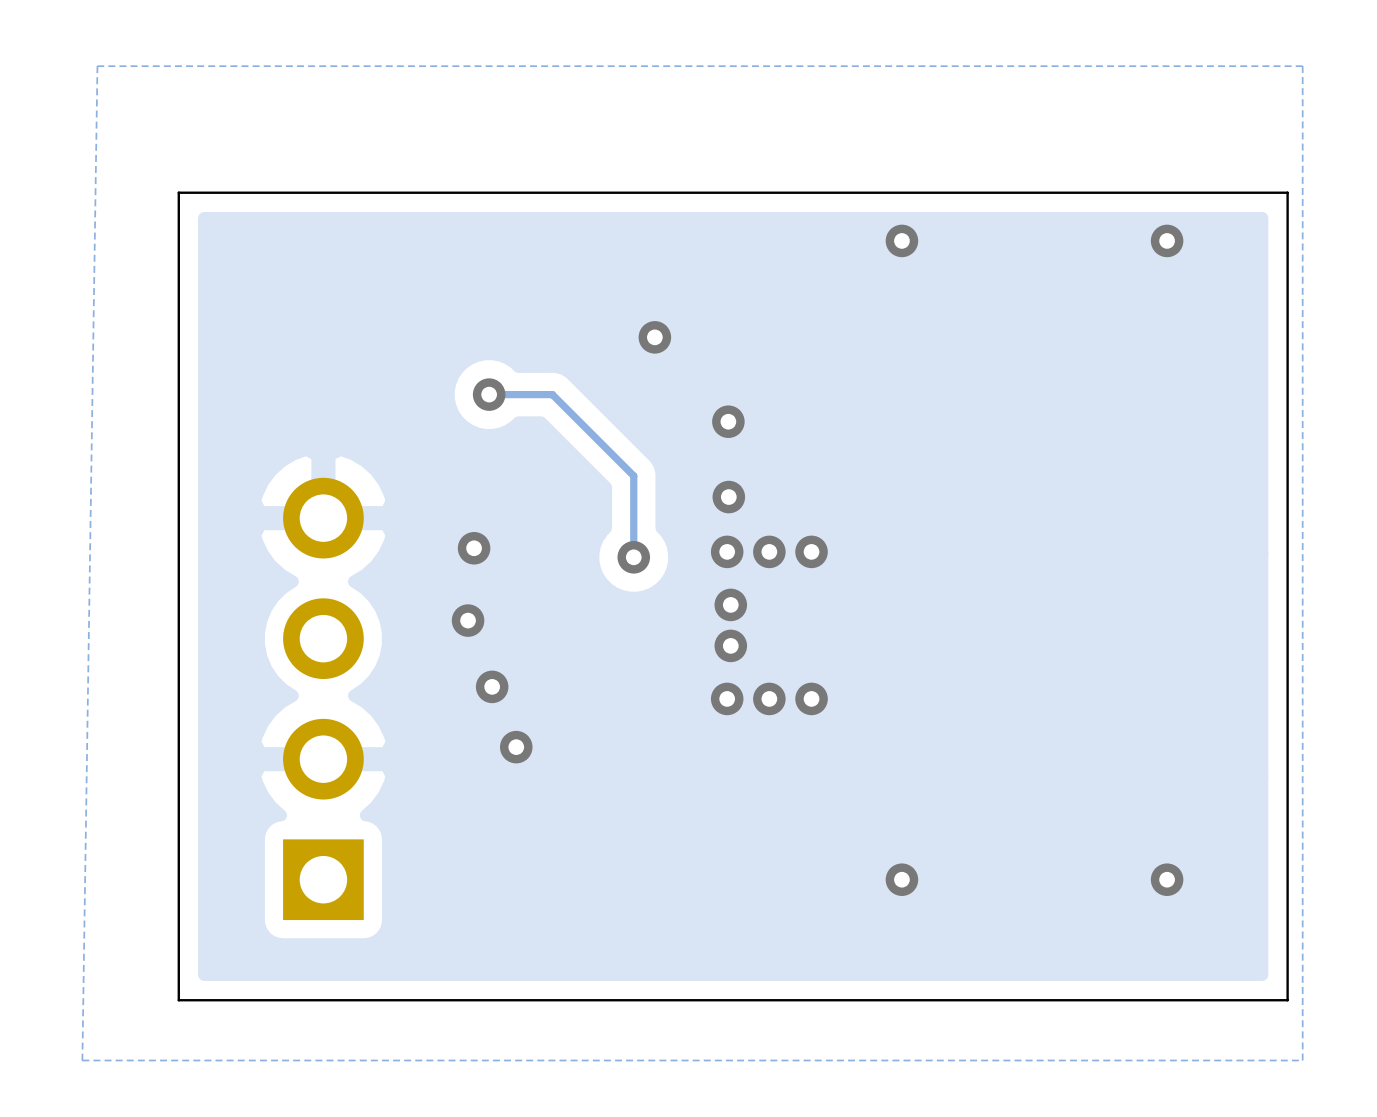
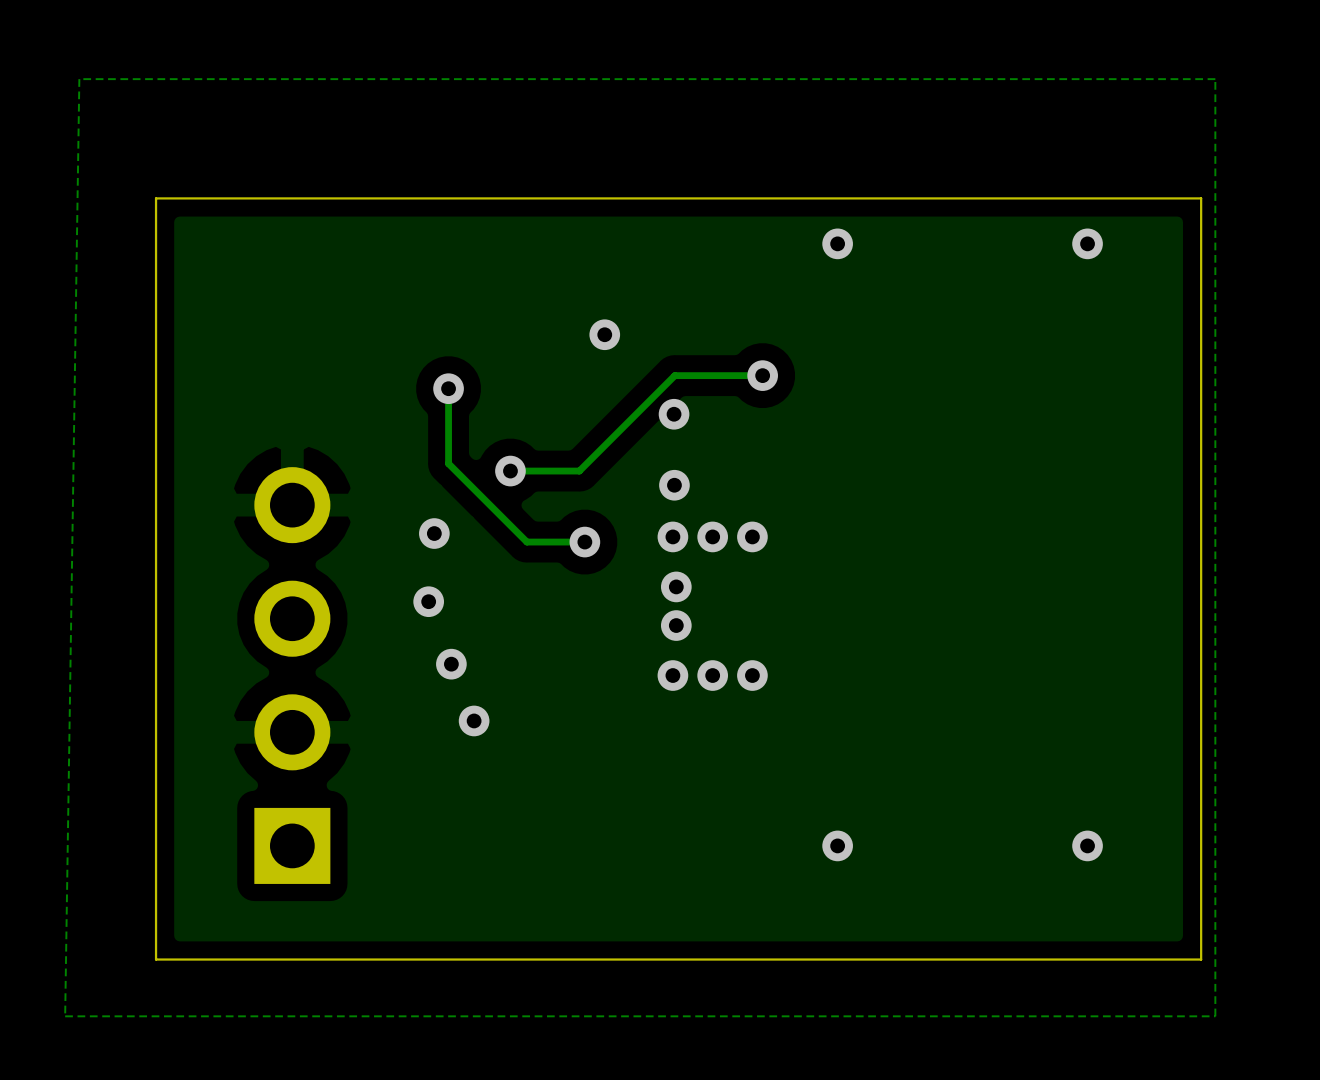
track: none -> (762, 375) (674, 375) (579, 471) (510, 471)
via: none -> (762, 375)
track: (489, 394) (552, 394) (633, 475) (633, 557) -> (448, 388) (448, 463) (526, 542) (584, 542)
via: none -> (510, 471)

